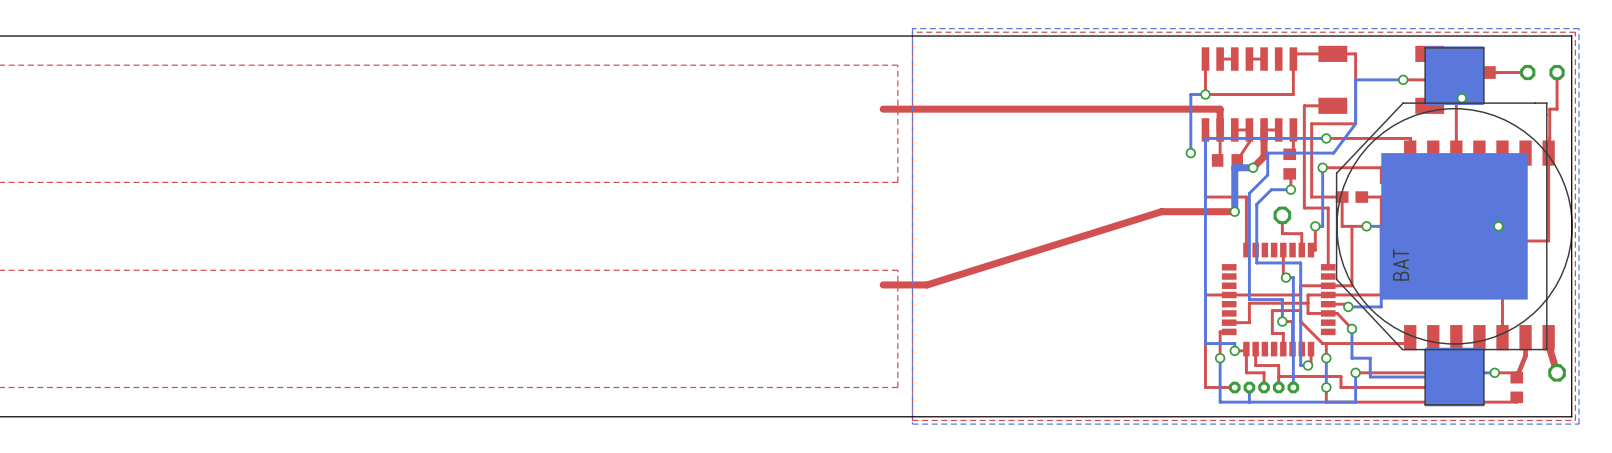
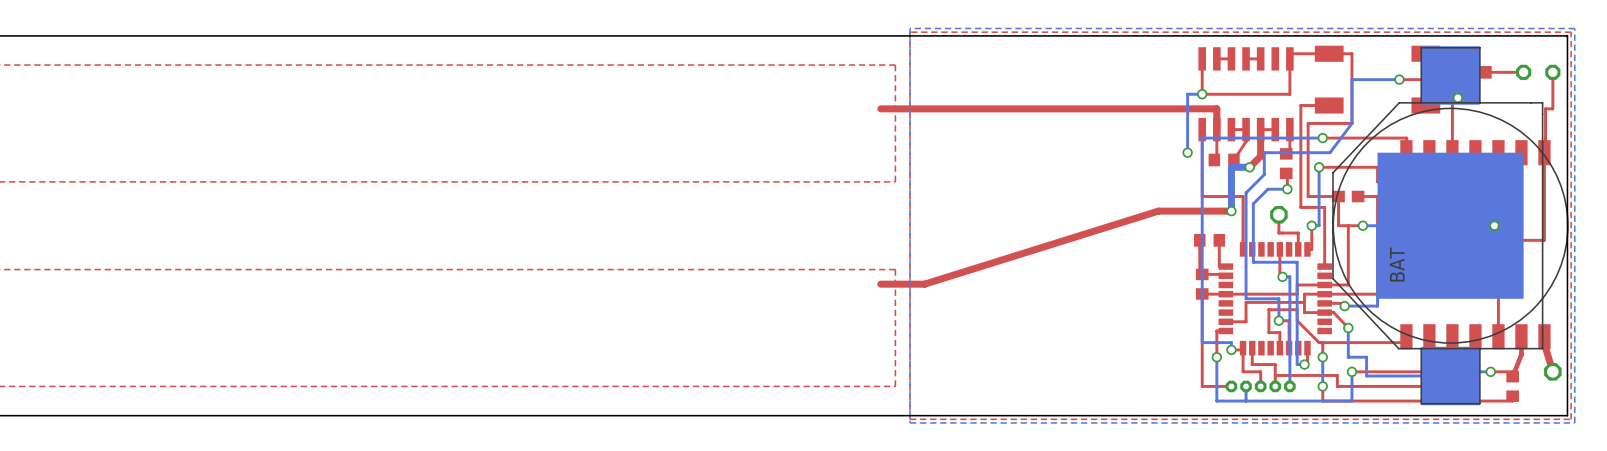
top track: none -> (1199, 240) (1199, 274) (1225, 275)
part: none -> (1209, 240)
top track: none -> (1219, 240) (1219, 266) (1225, 266)
part: none -> (1202, 284)

